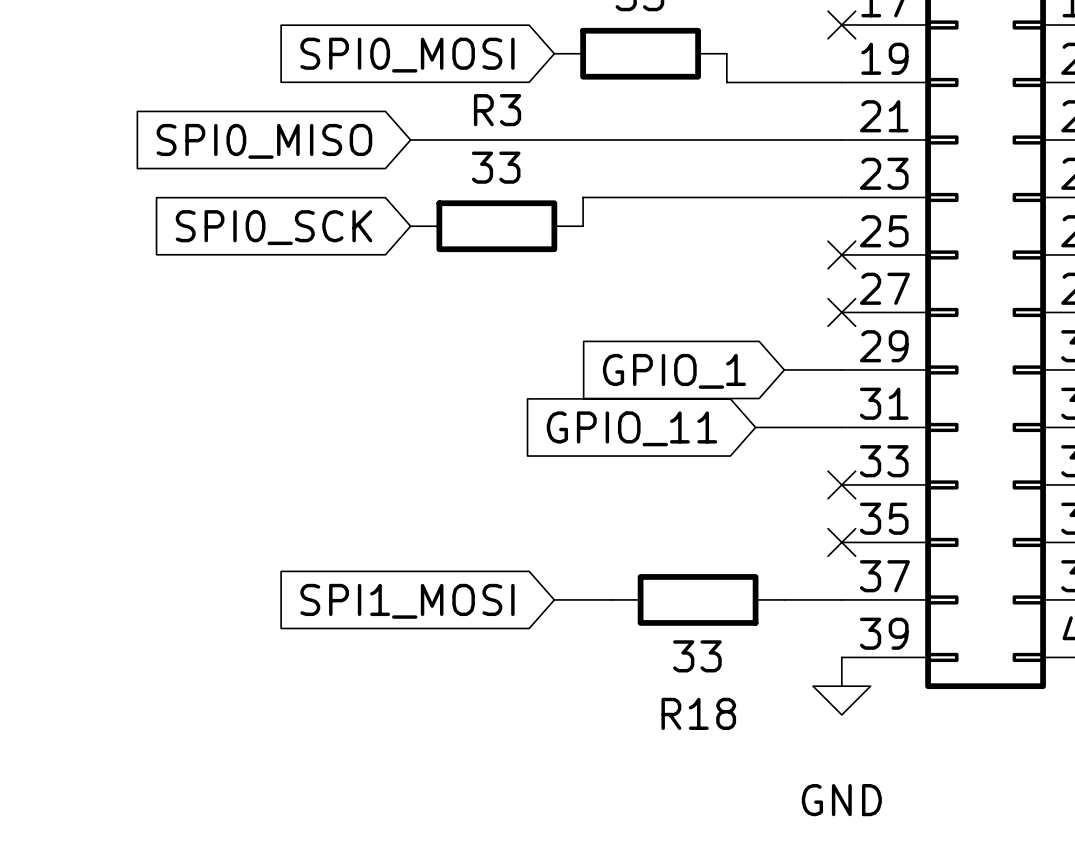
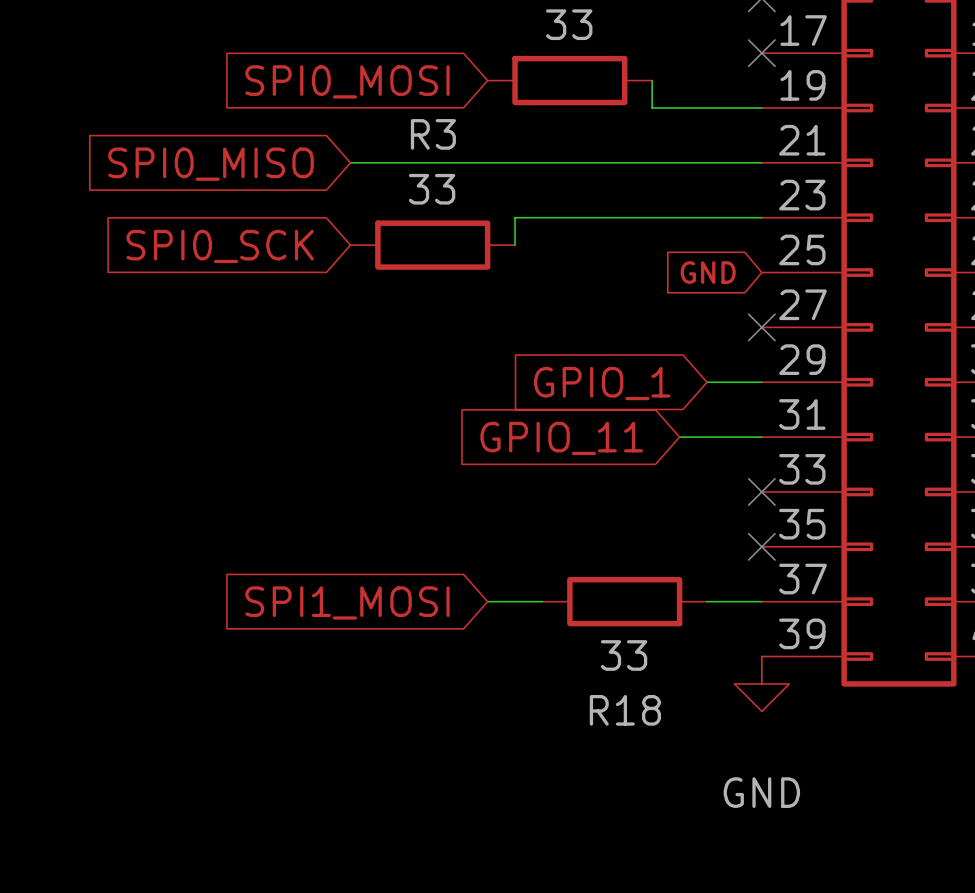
global label: none -> GND (708, 272)
no-connect mark: (841, 254) -> none

